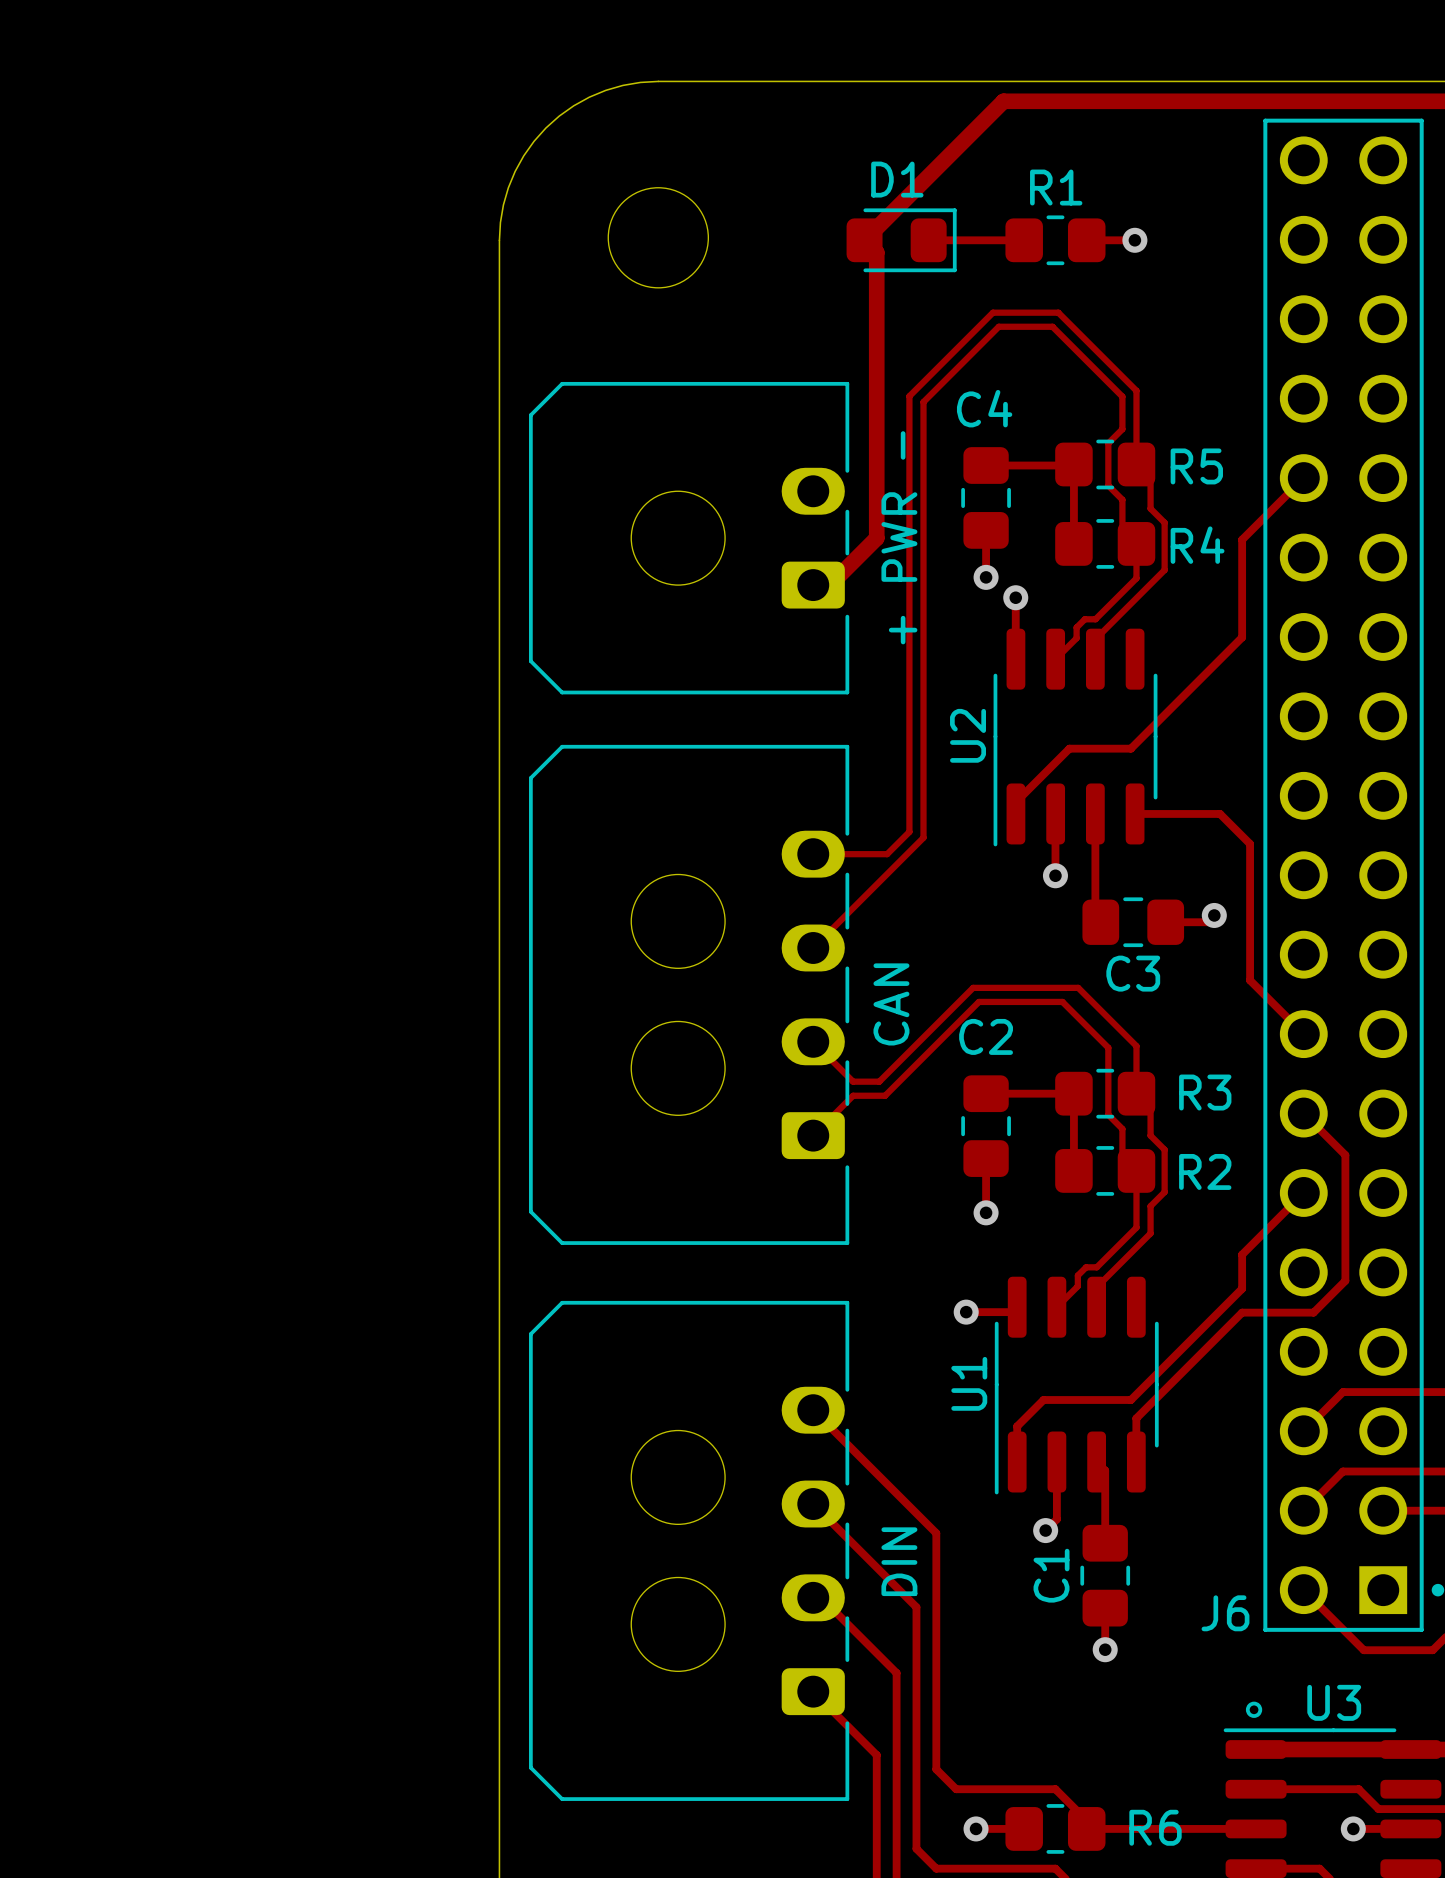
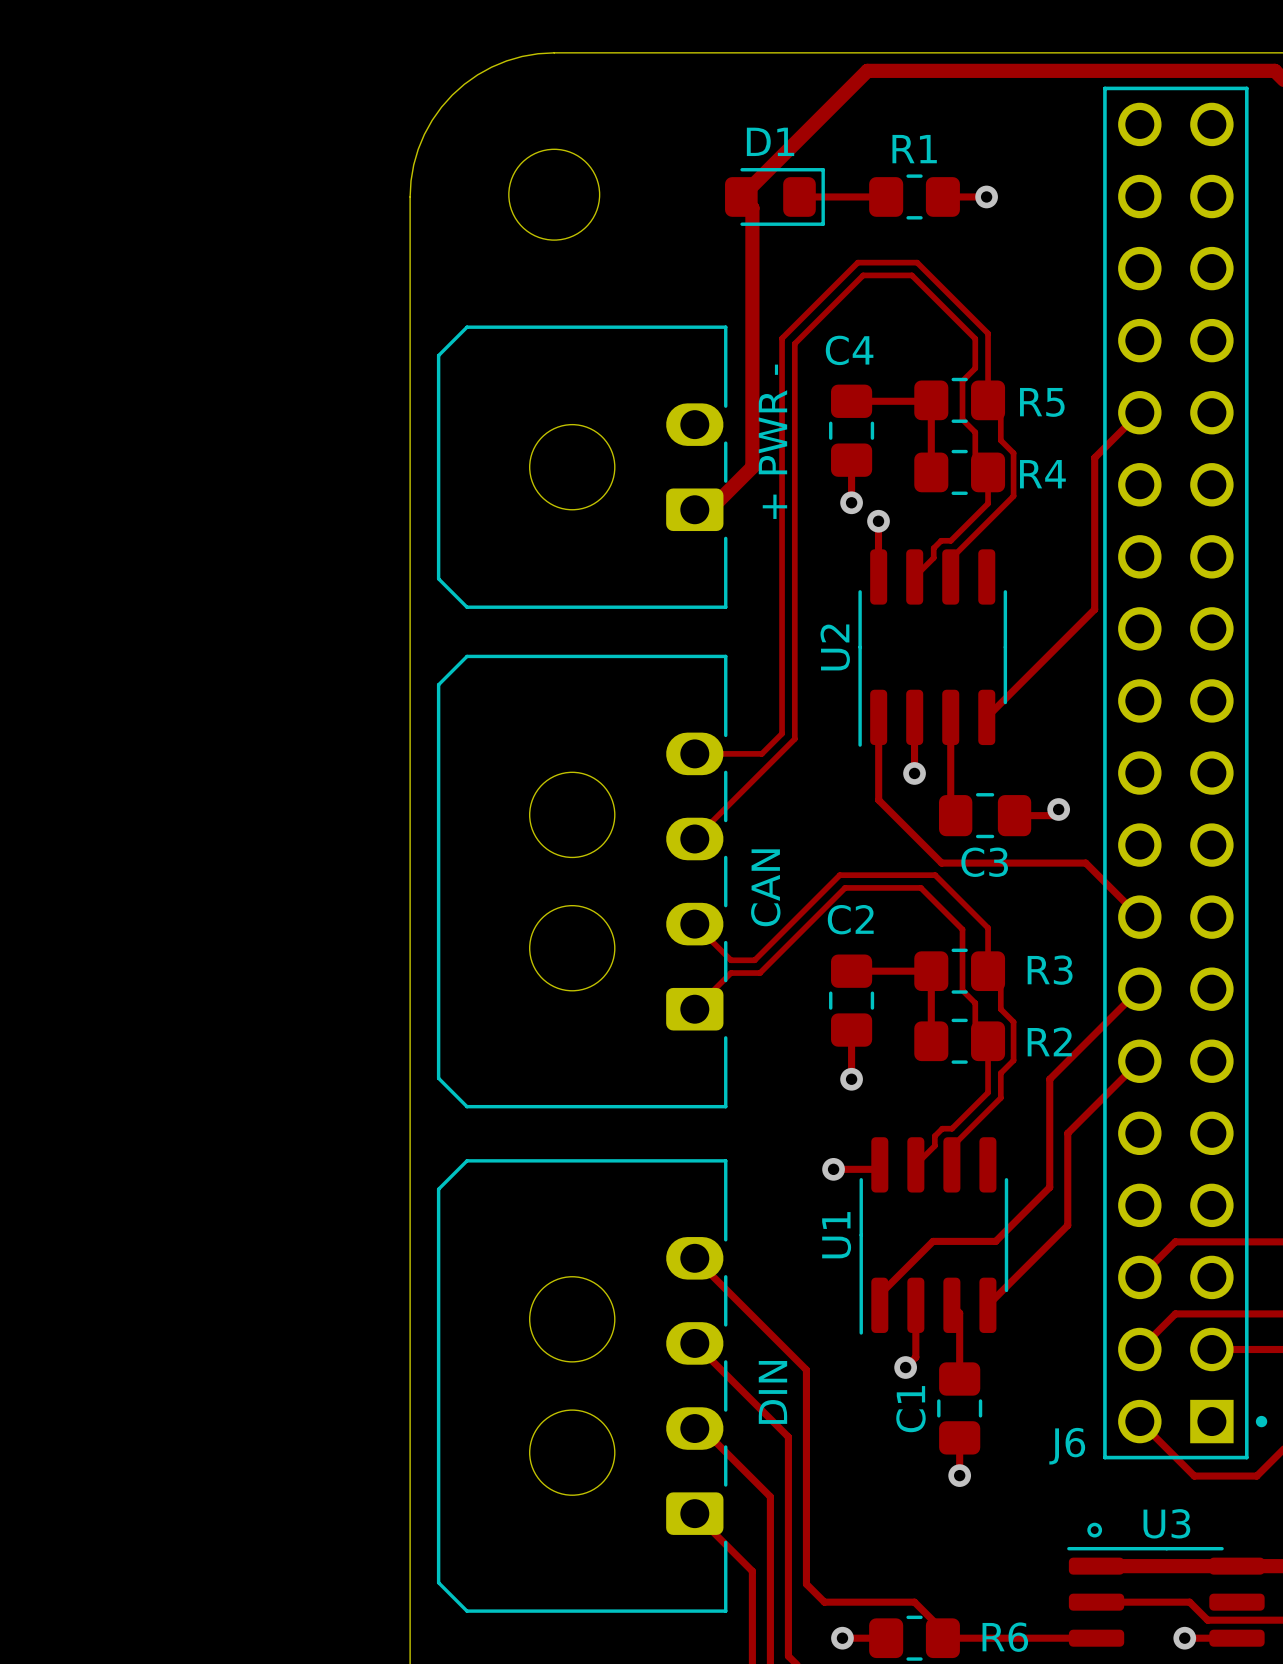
track: (1254, 527) (1242, 539) (1242, 637) (1130, 748) (1069, 748) (1015, 802) (1015, 813) -> (1094, 457) (1094, 609) (986, 717)
track: (1135, 813) (1220, 813) (1250, 843) (1250, 980) -> (878, 717) (878, 800) (941, 863) (1085, 863) (1091, 868)
track: (1303, 1113) (1345, 1155) (1345, 1280) (1313, 1312) (1242, 1312) (1136, 1418) (1136, 1462) -> (1139, 989) (1049, 1079) (1049, 1187) (995, 1241) (933, 1241) (879, 1294)
track: (1242, 1254) (1242, 1288) (1130, 1400) (1043, 1400) (1017, 1426) (1017, 1450) -> (1083, 1117) (1067, 1133) (1067, 1225) (987, 1305)

